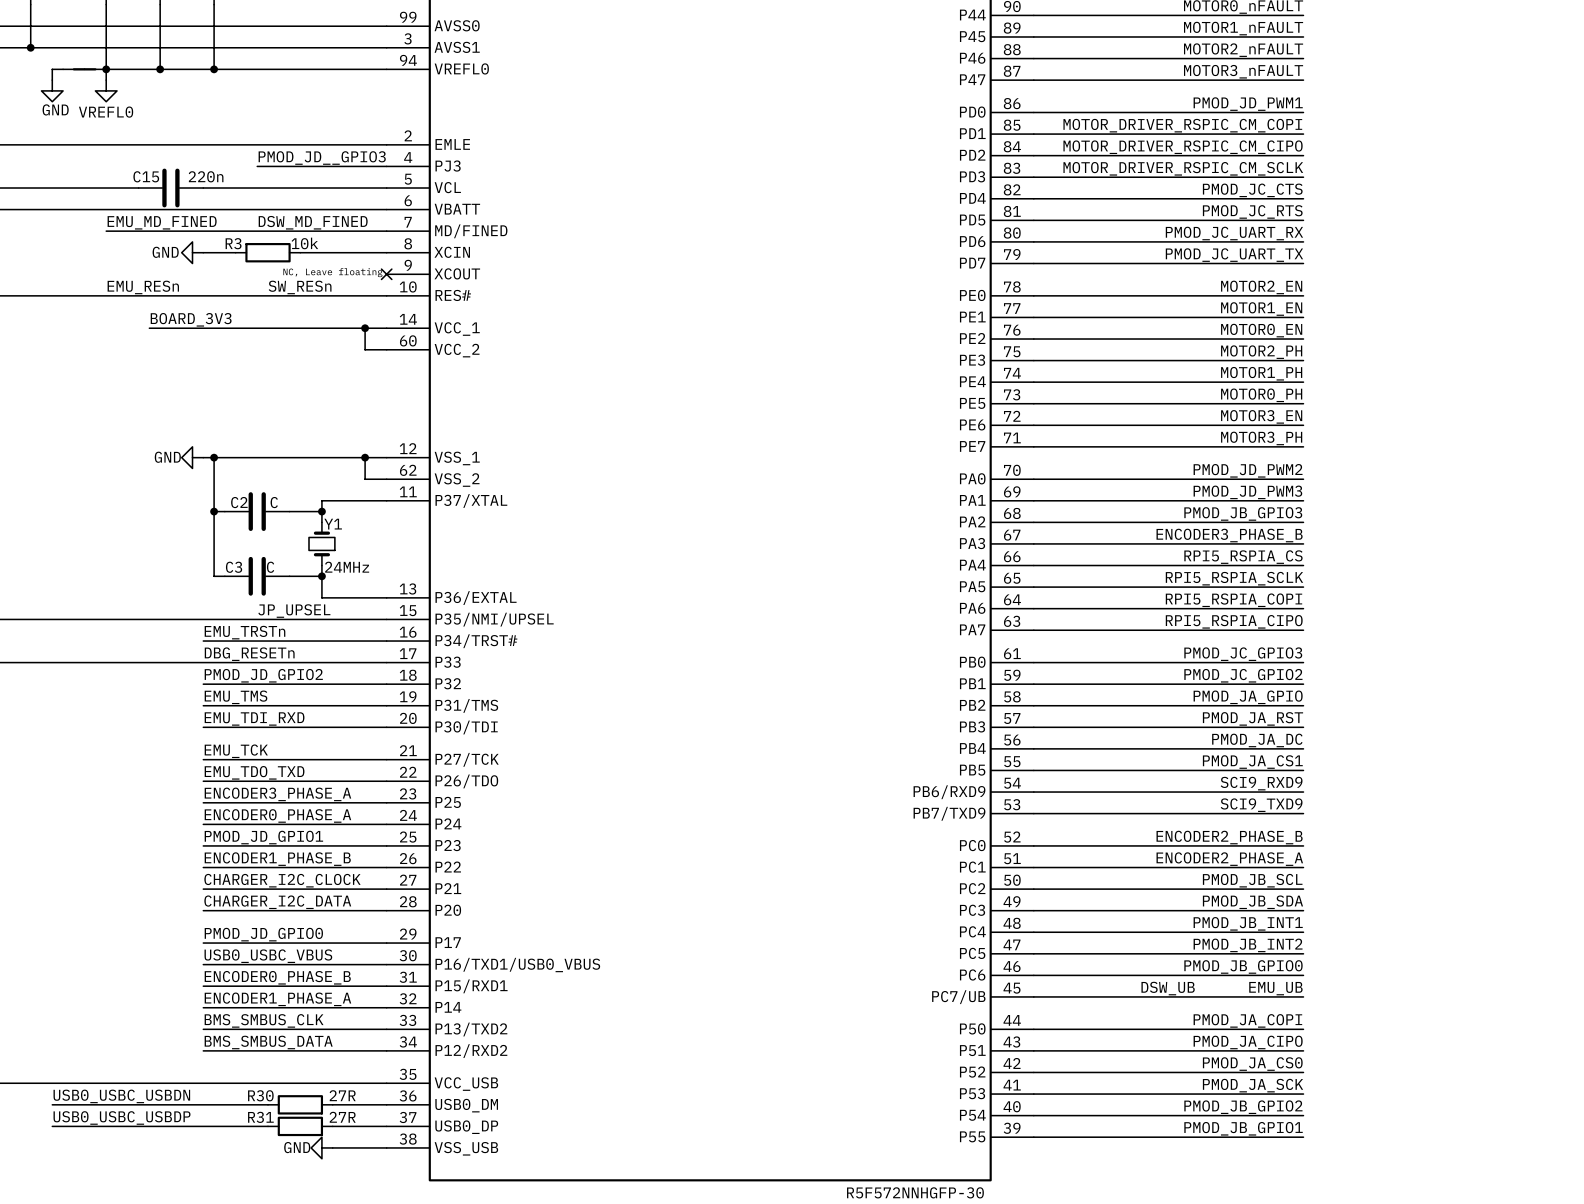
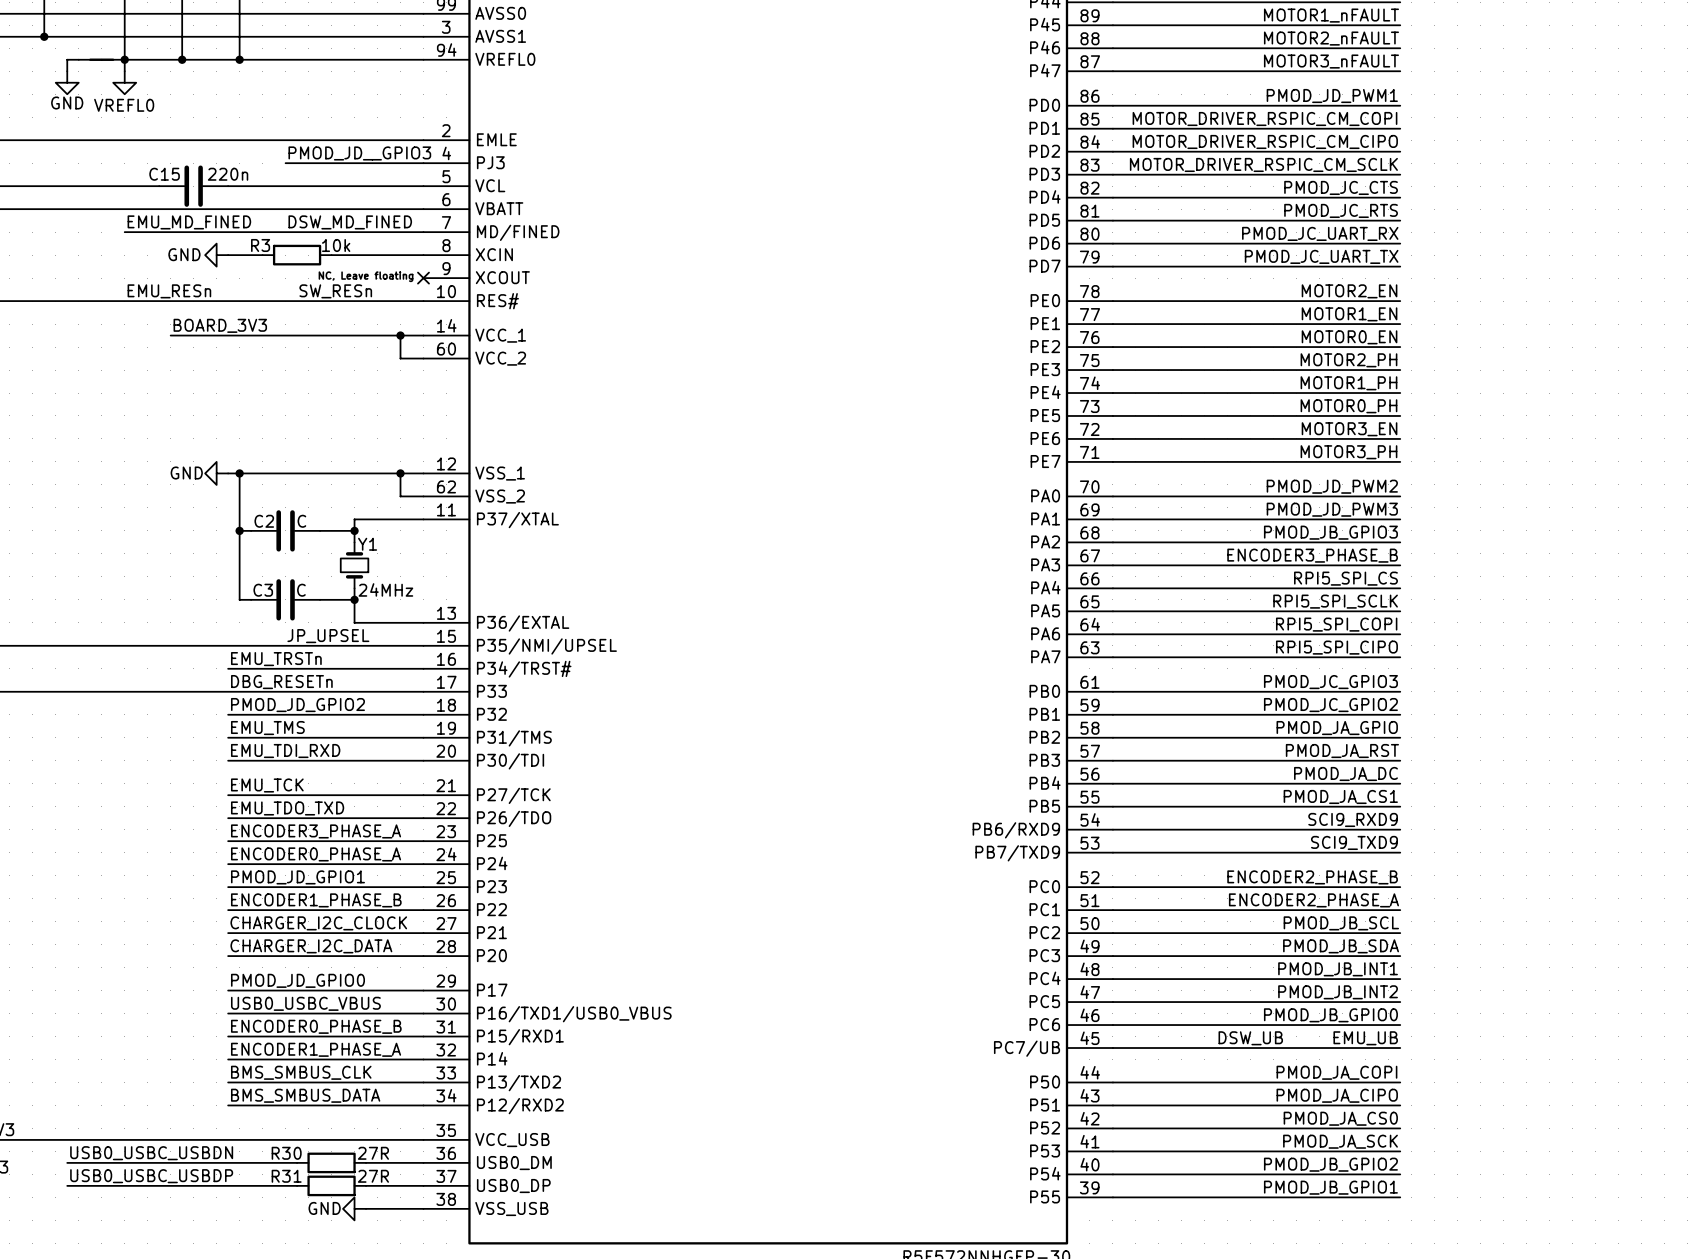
label: RPI5_RSPIA_CS (1243, 557) -> RPI5_SPI_CS (1345, 578)
label: RPI5_RSPIA_SCLK (1234, 578) -> RPI5_SPI_SCLK (1335, 601)
label: RPI5_RSPIA_COPI (1233, 600) -> RPI5_SPI_COPI (1336, 624)
label: RPI5_RSPIA_CIPO (1234, 621) -> RPI5_SPI_CIPO (1336, 647)

